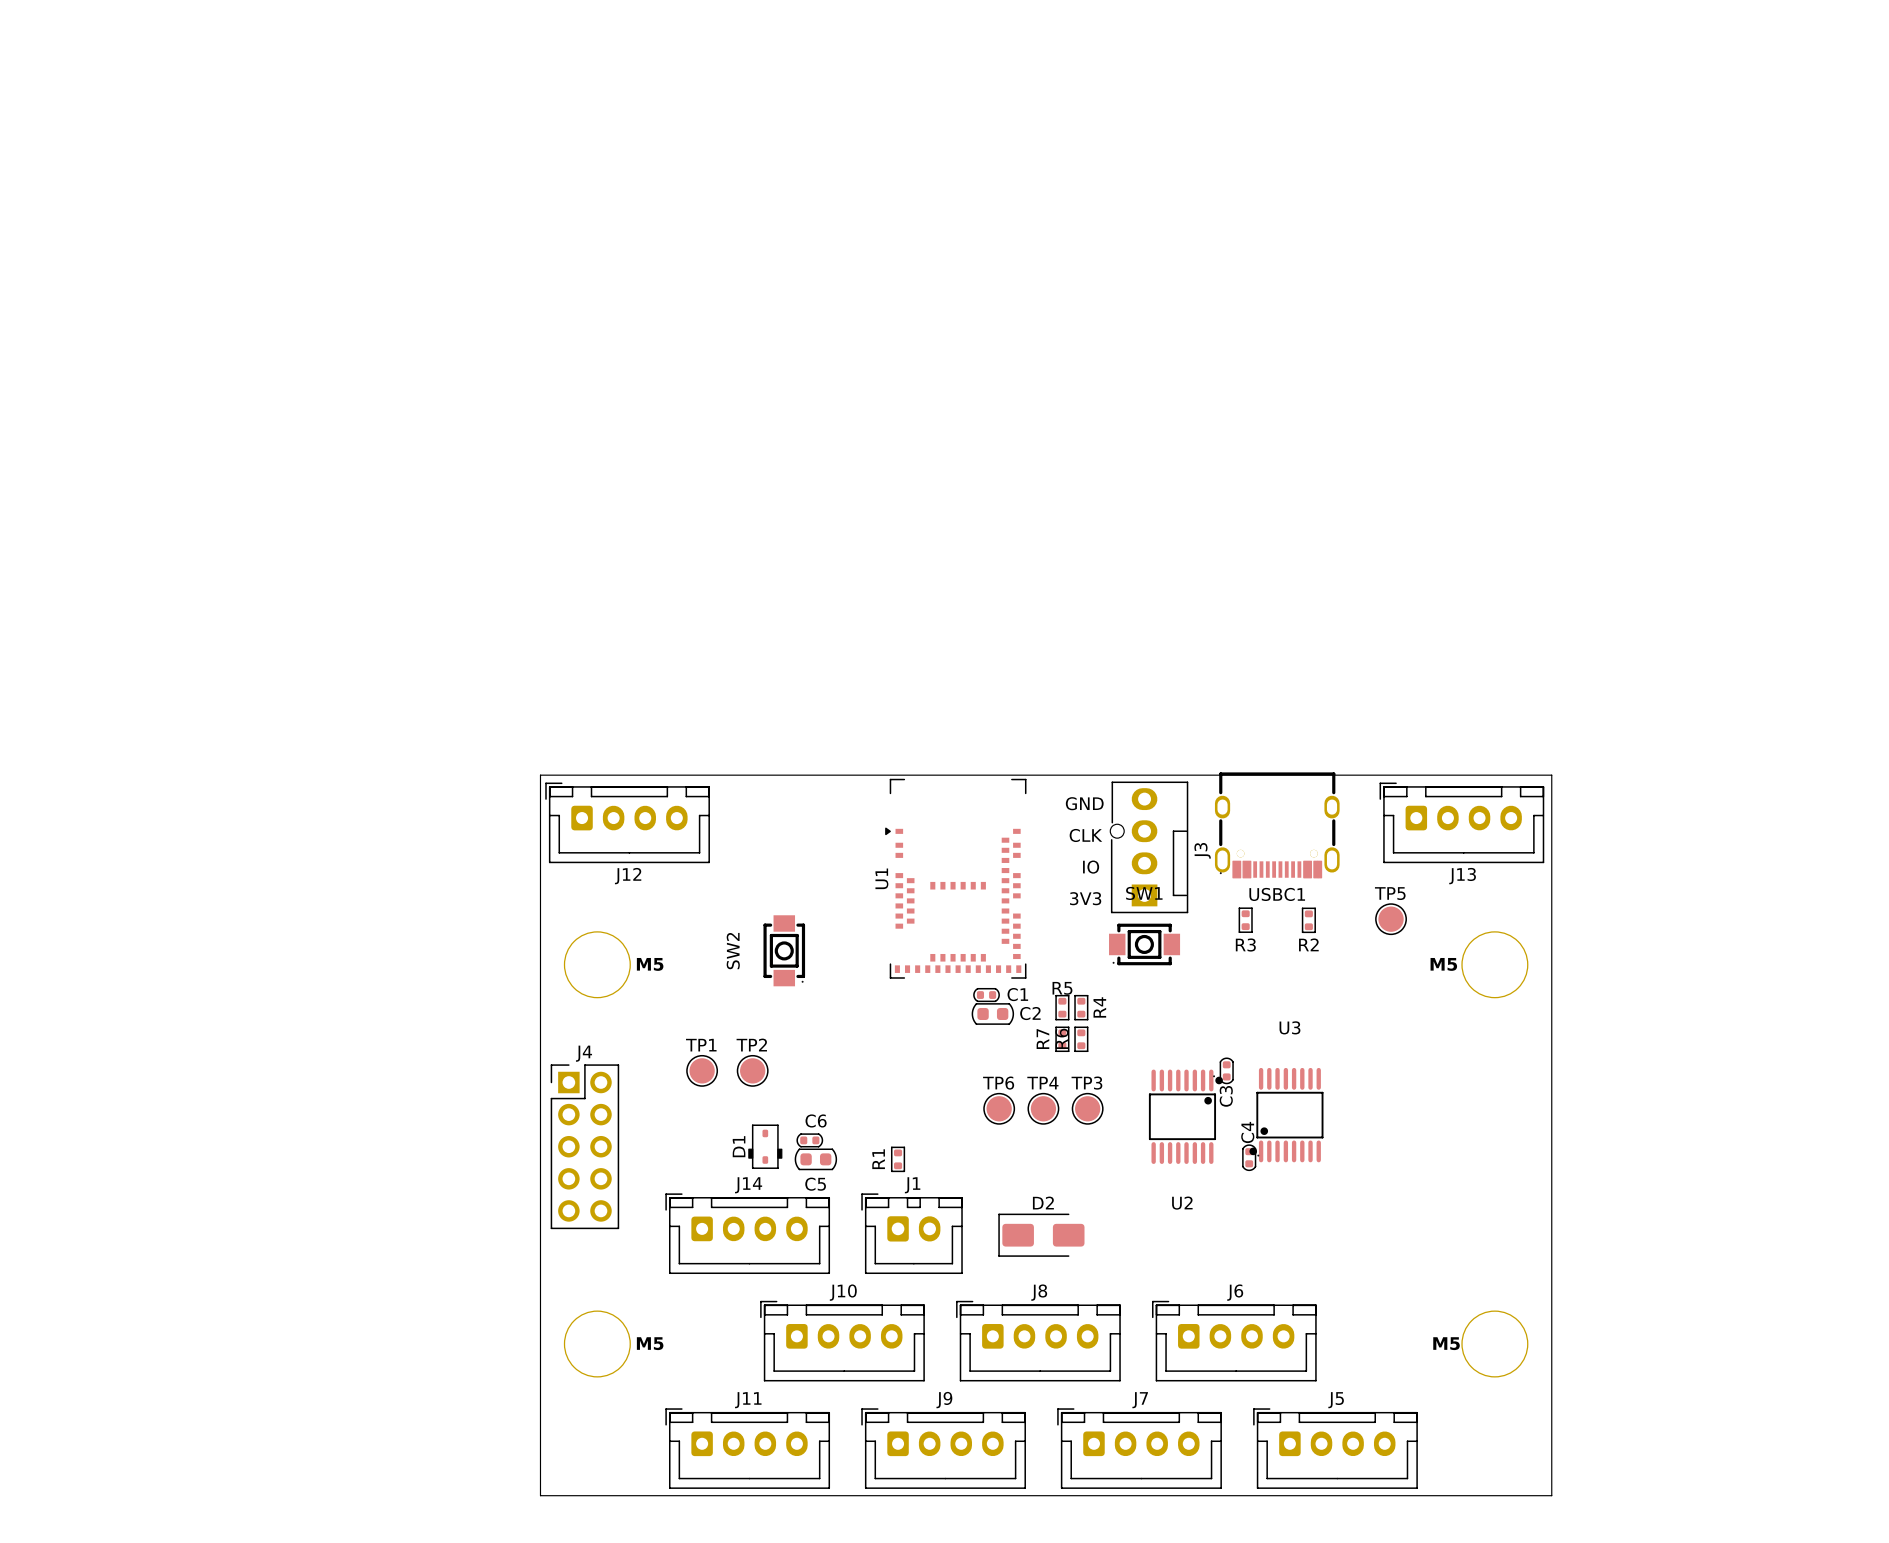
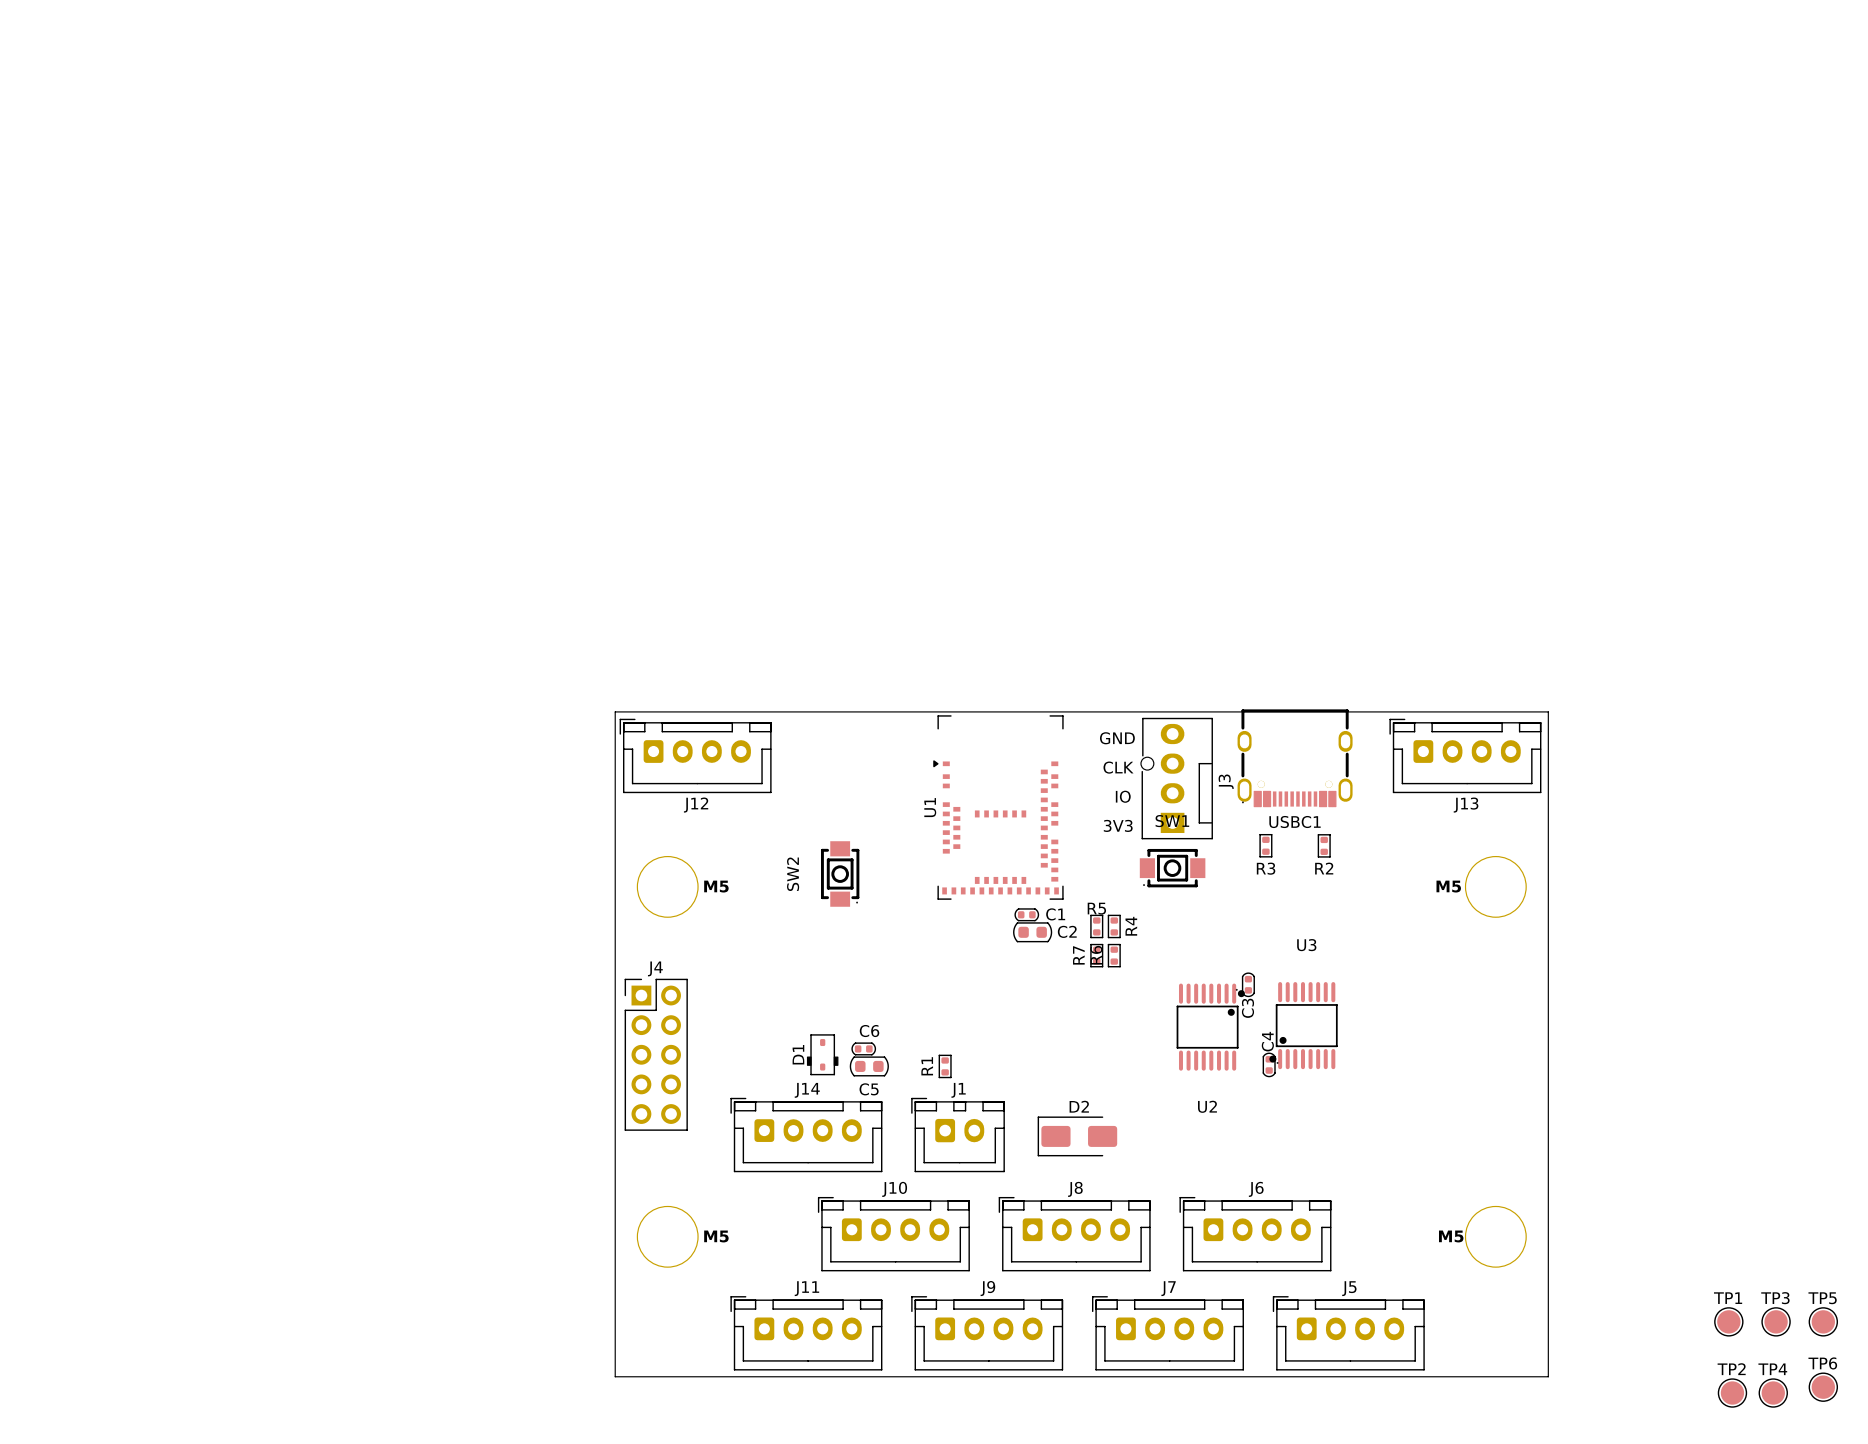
TP5 position: (1391, 919) -> (1823, 1321)
TP1 position: (702, 1070) -> (1728, 1321)
TP2 position: (752, 1070) -> (1732, 1393)
TP6 position: (999, 1108) -> (1823, 1387)
TP4 position: (1043, 1108) -> (1773, 1393)
TP3 position: (1087, 1108) -> (1776, 1321)

